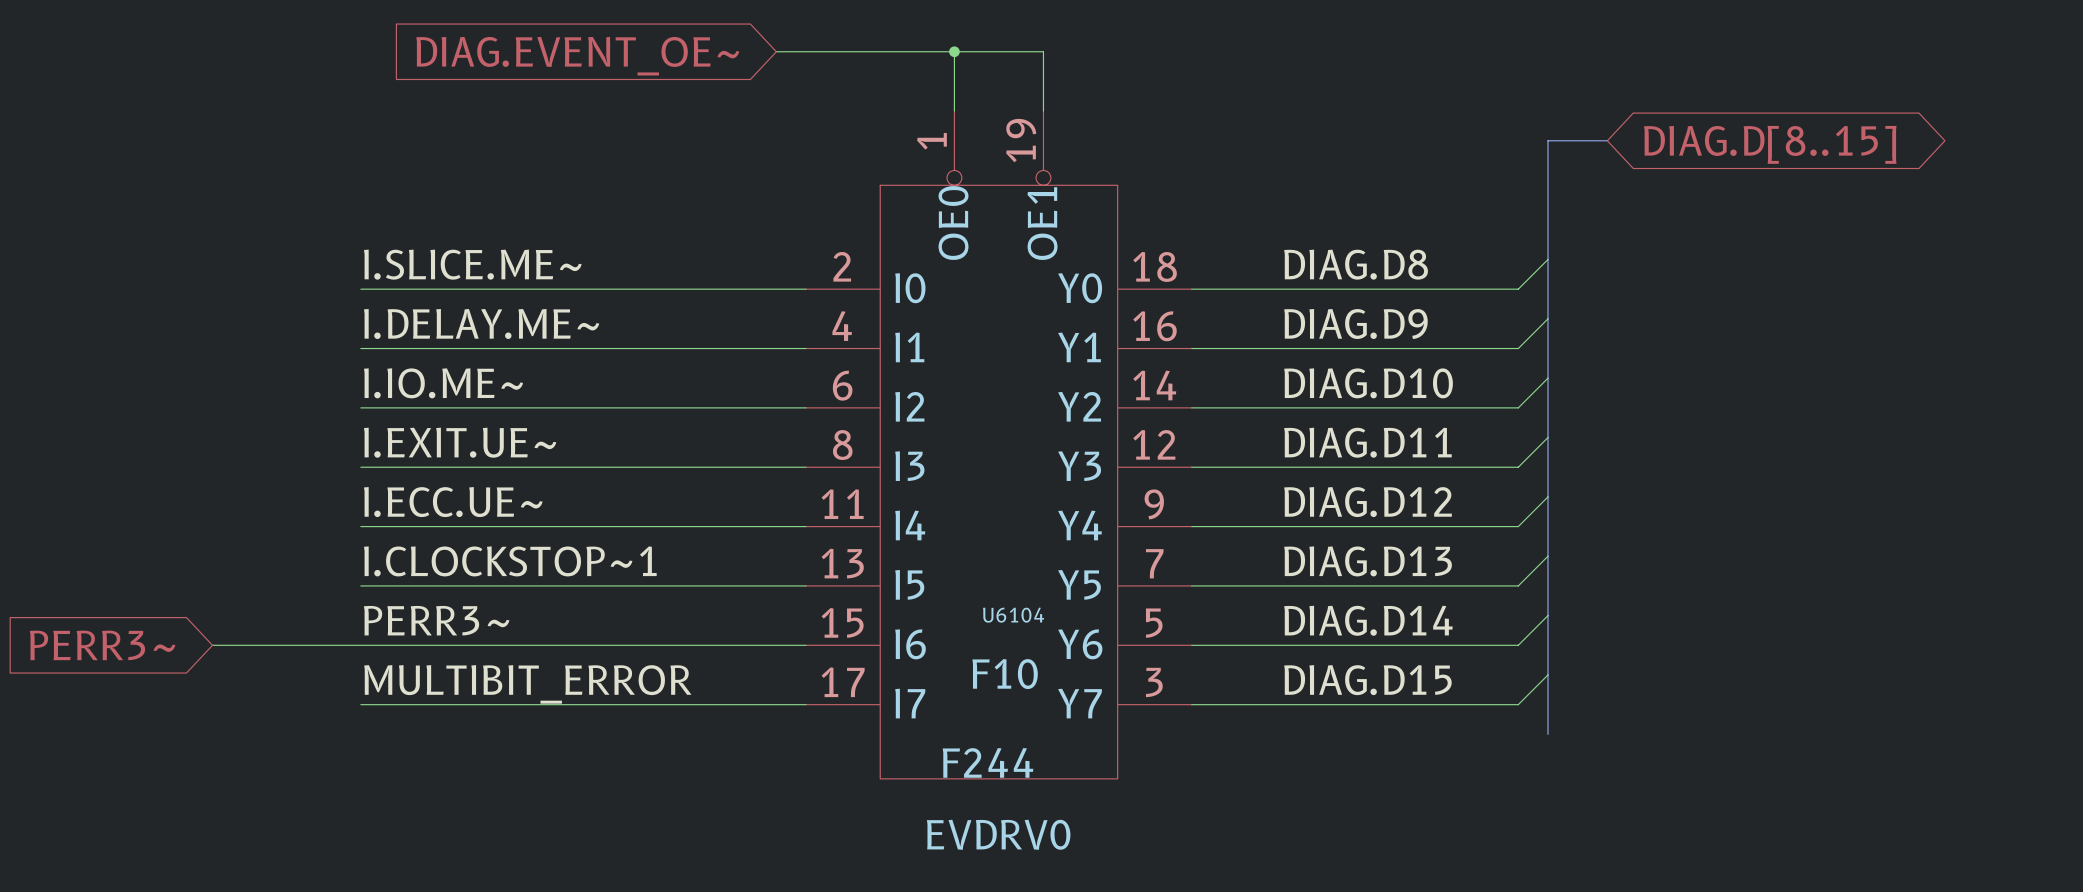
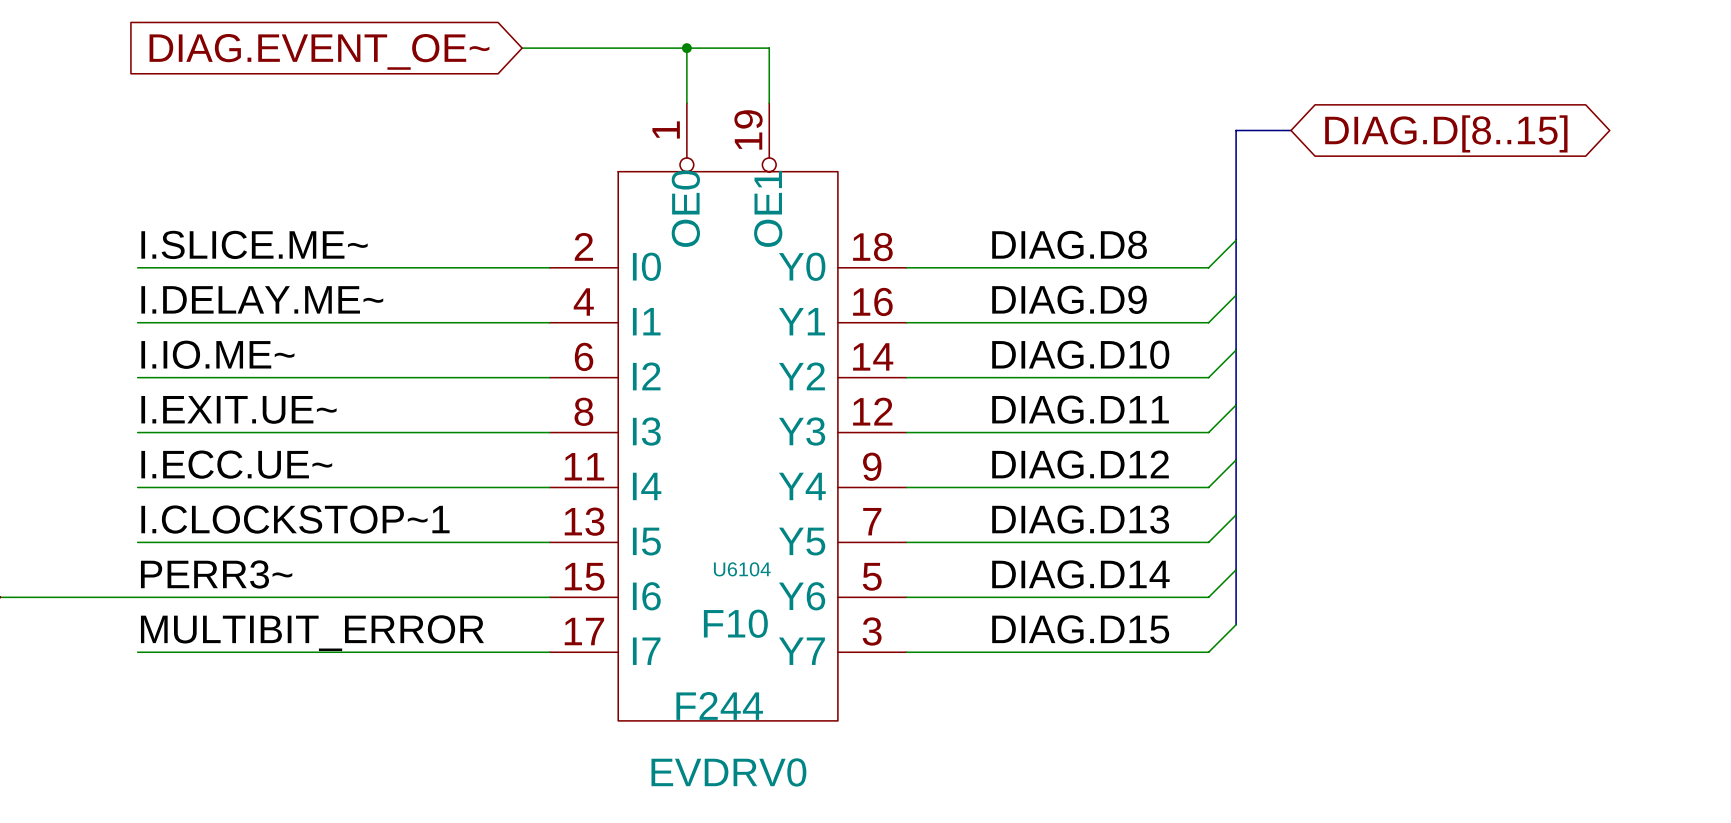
bus: (1547, 674) (1547, 734) -> none

